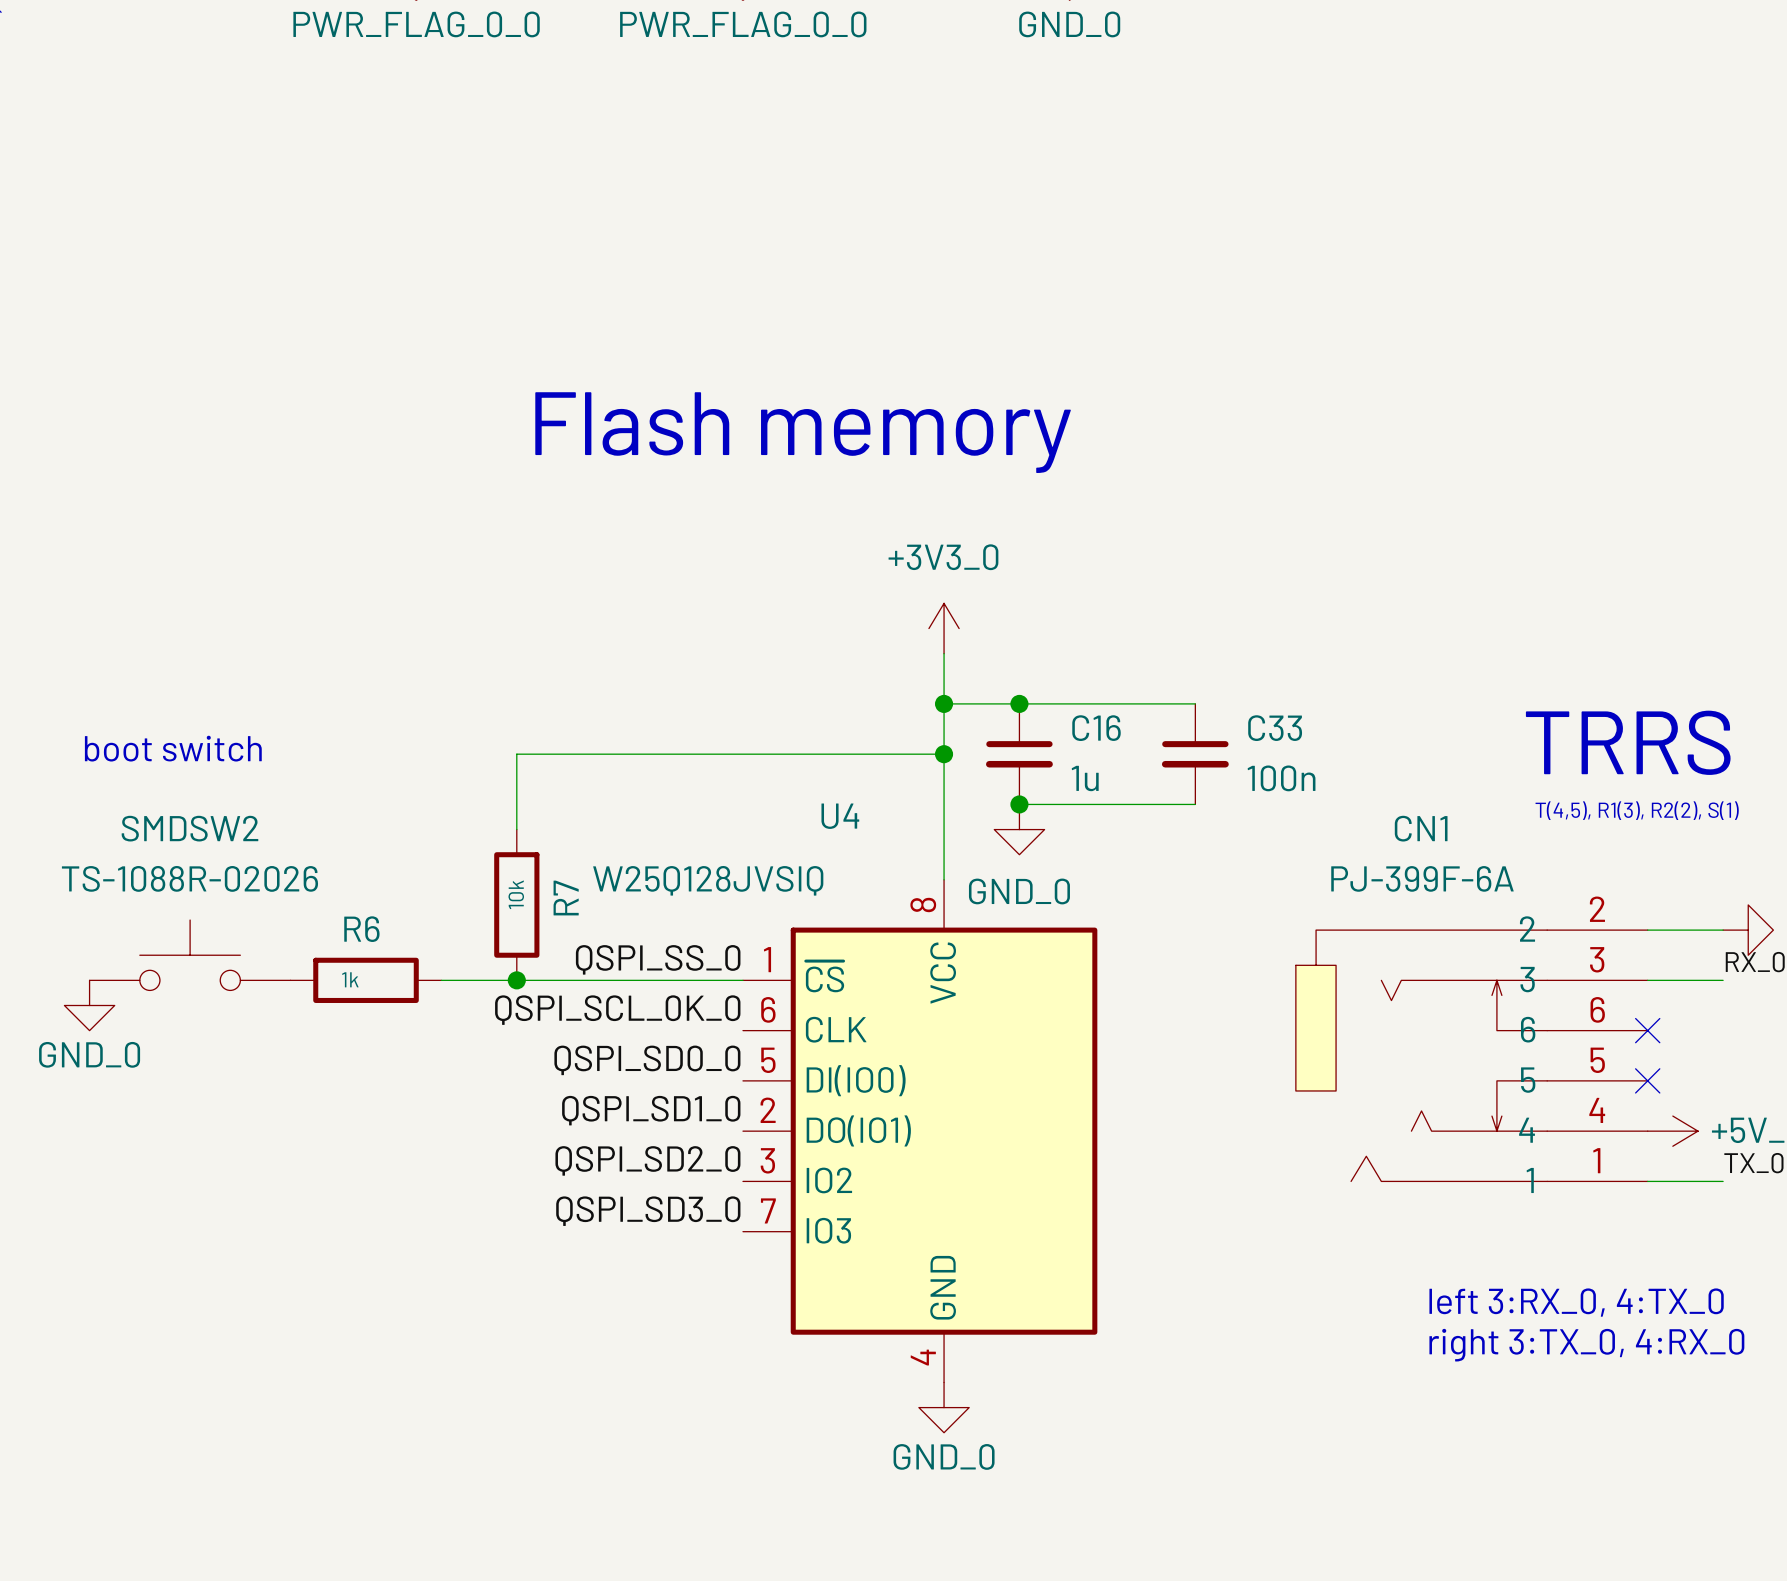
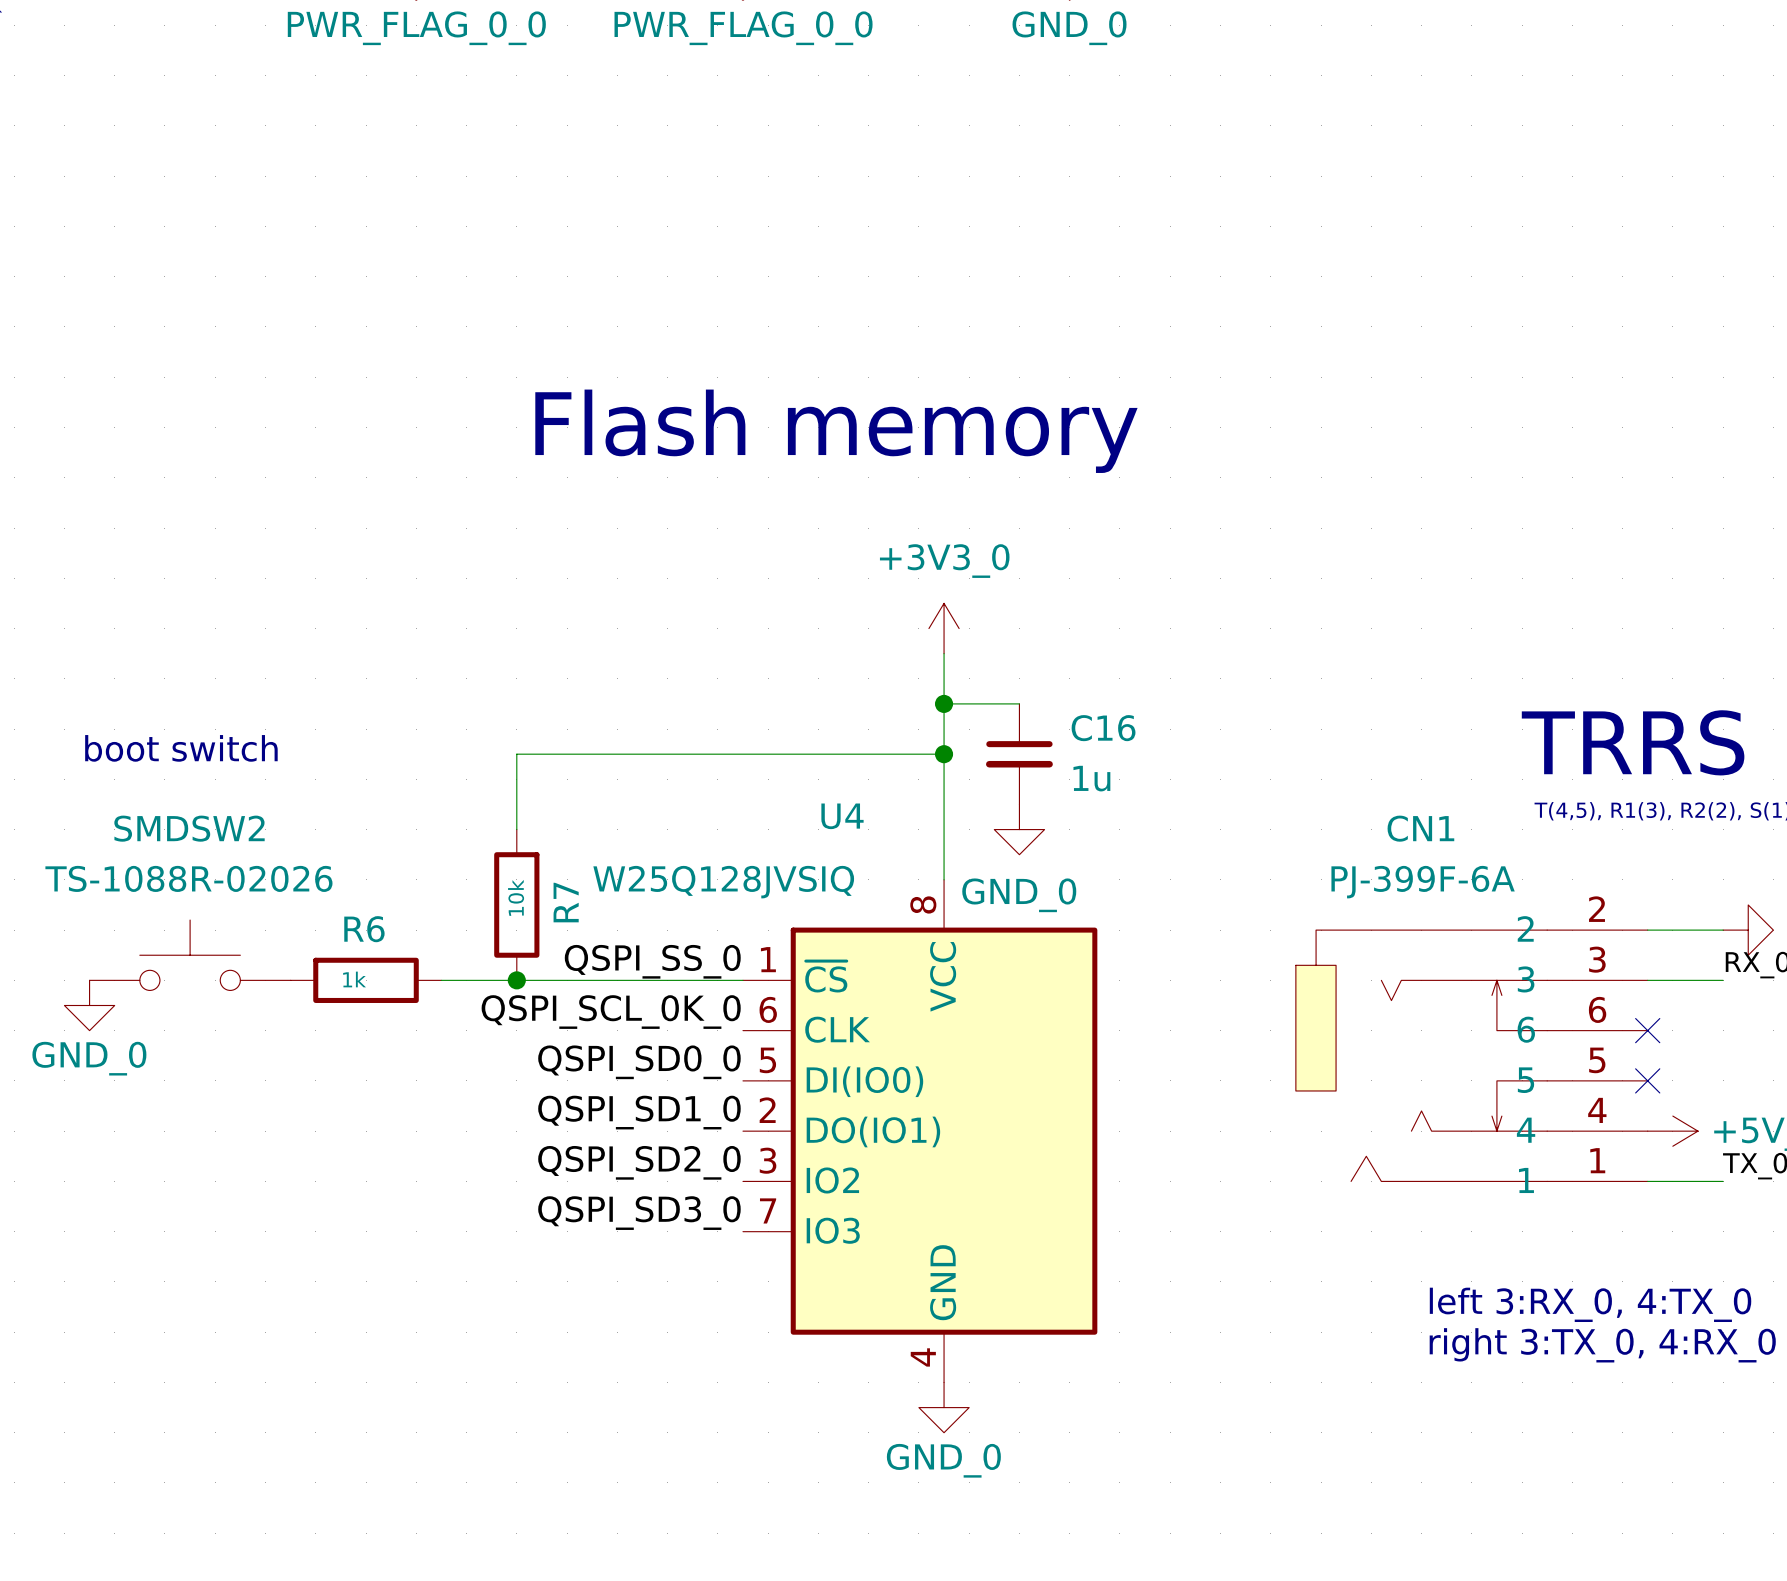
wire: (1019, 703) (1195, 703) -> none
junction: (1019, 703) -> none
C33: 100n (1195, 754) -> none
wire: (1019, 804) (1195, 804) -> none
junction: (1019, 804) -> none

